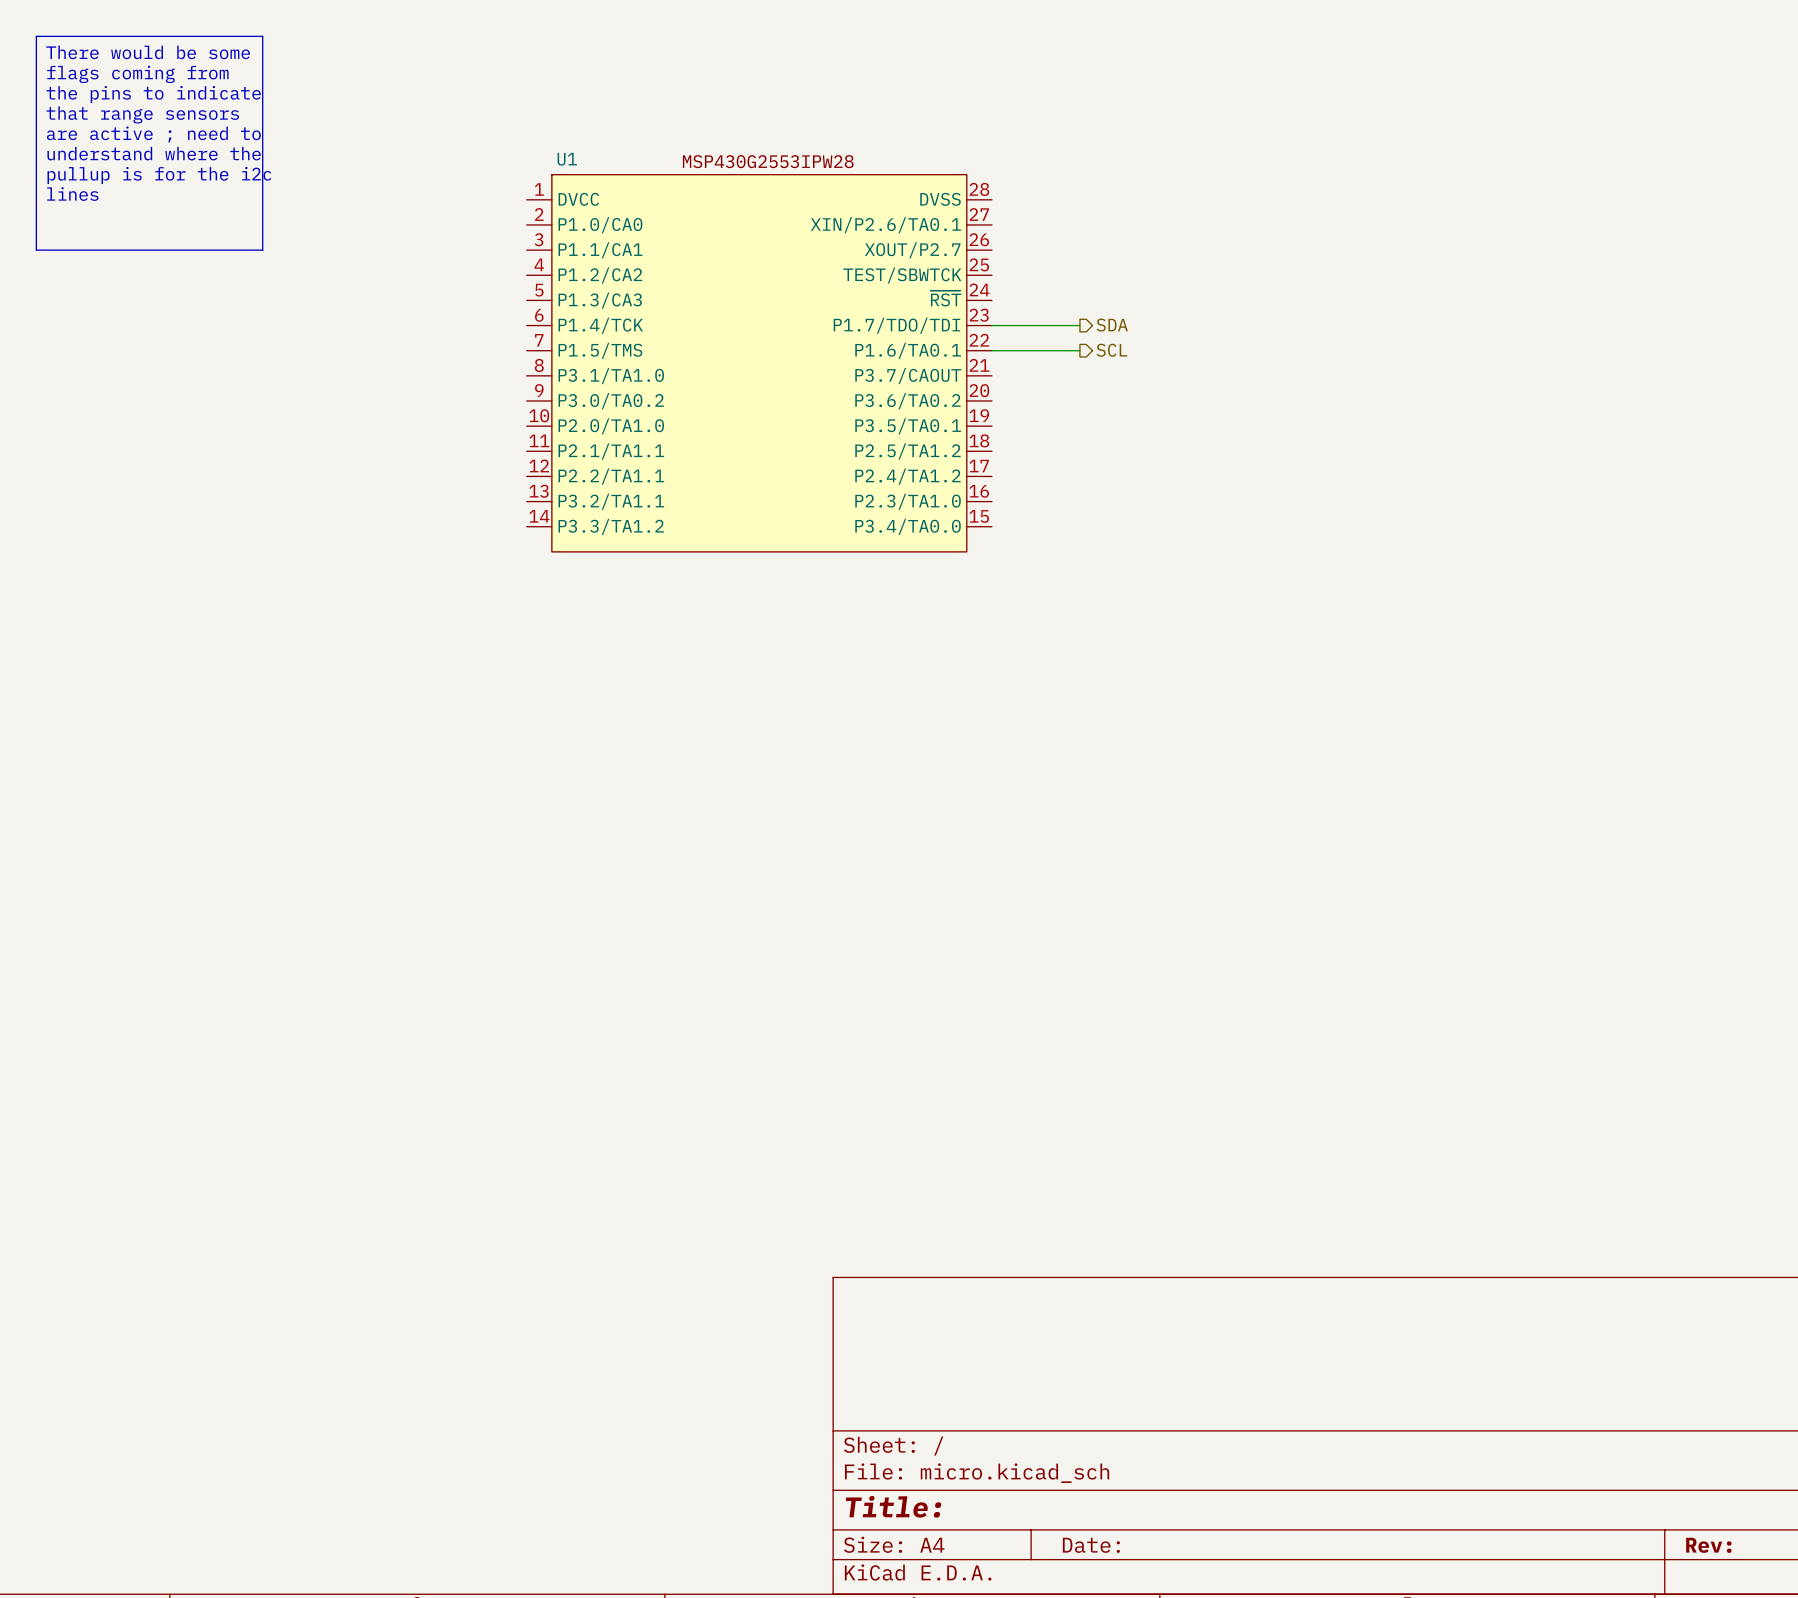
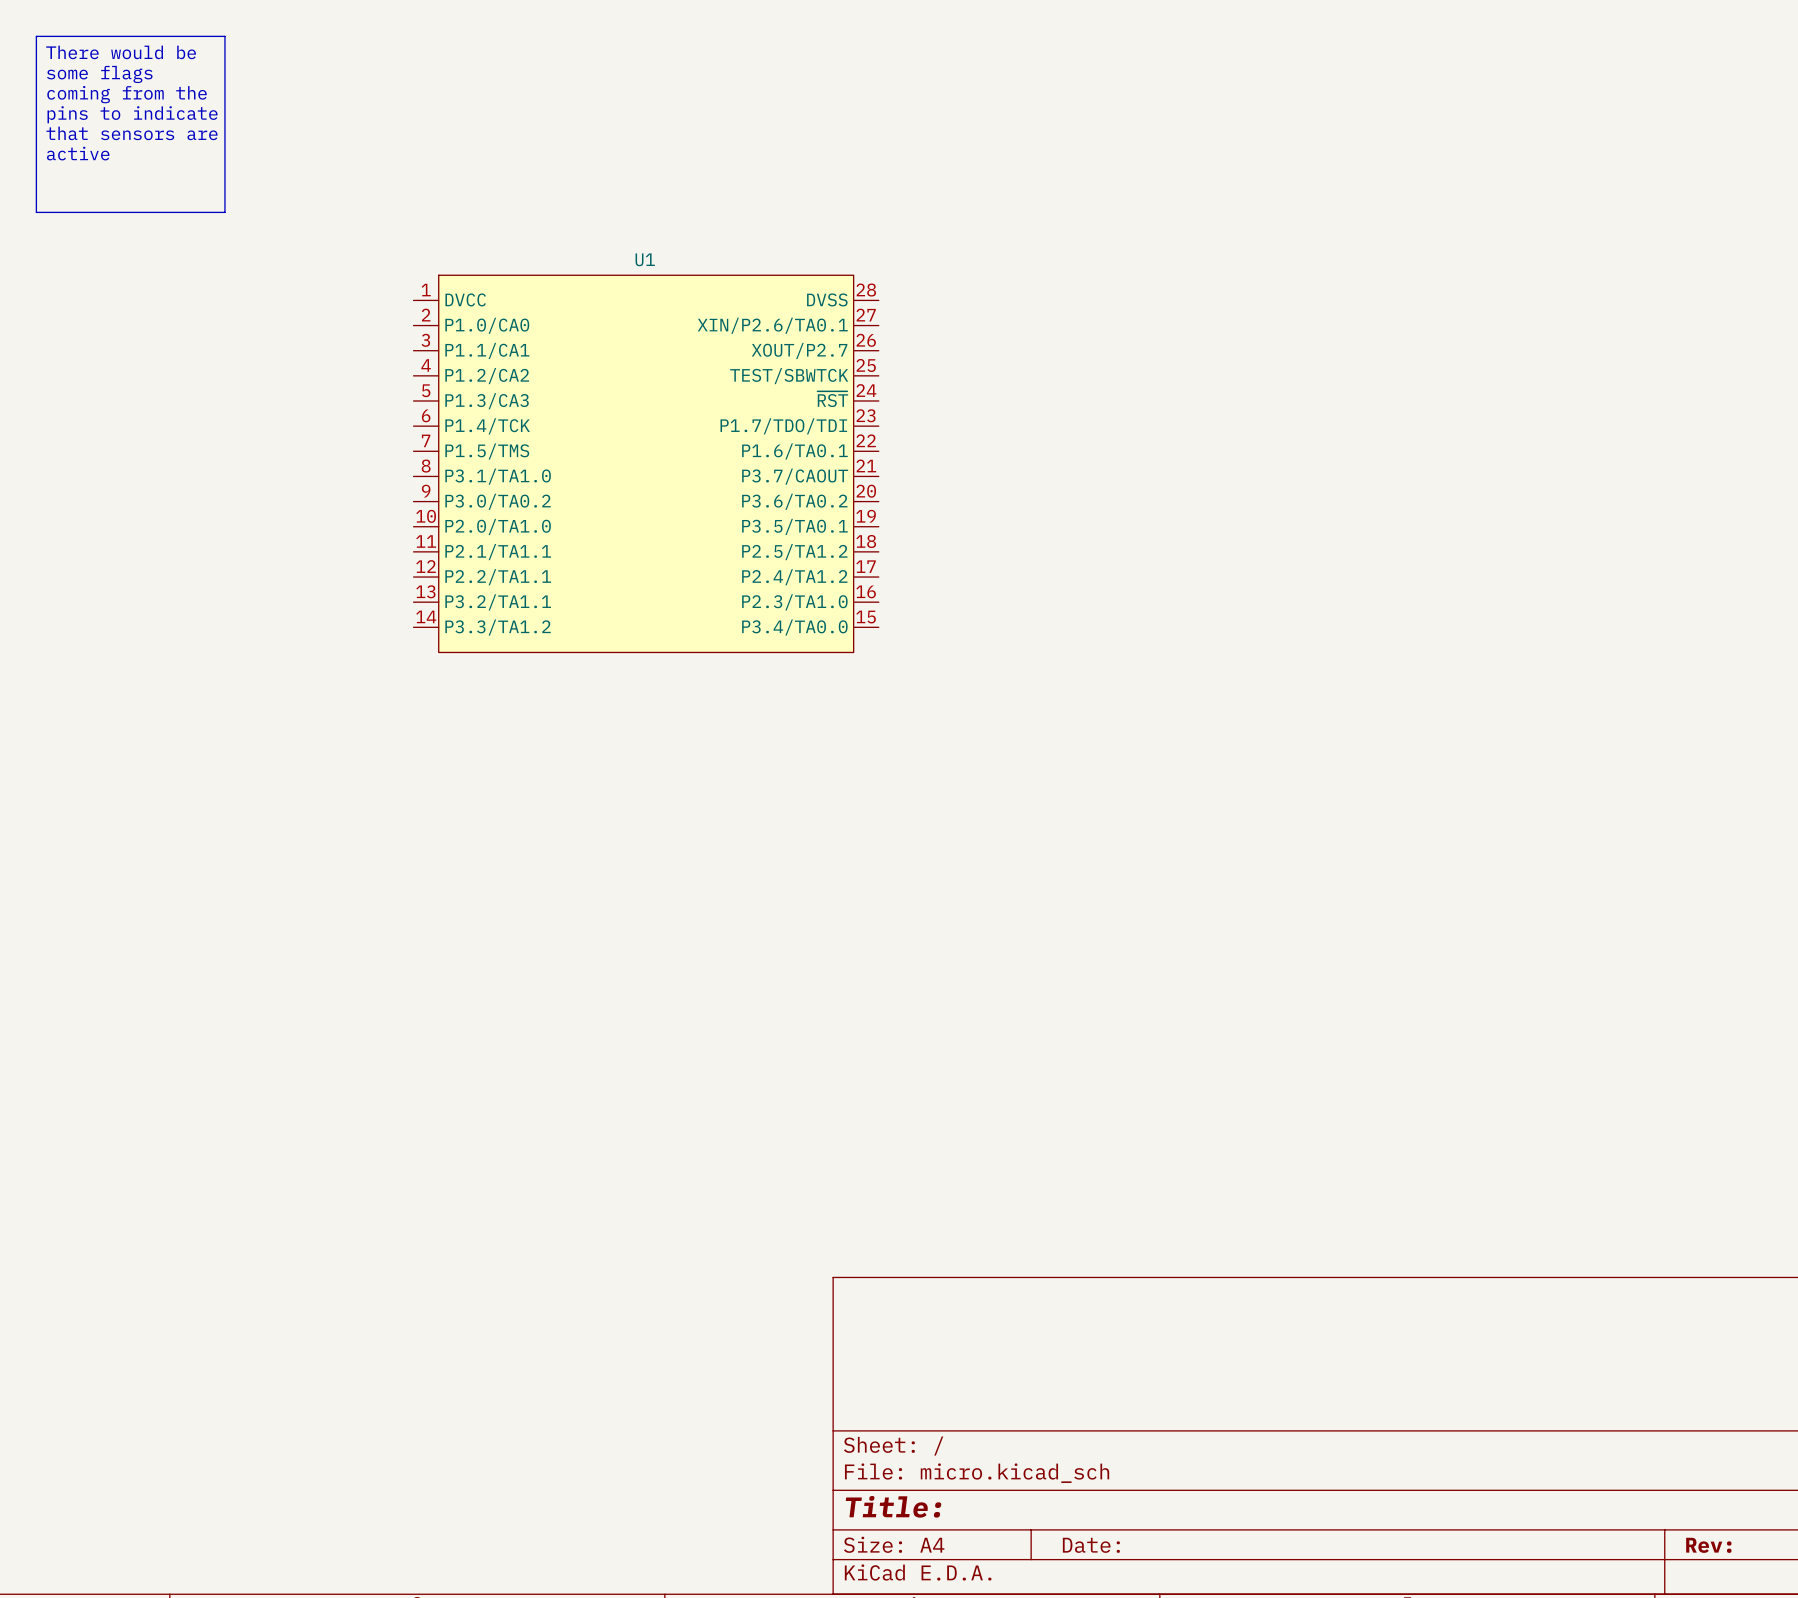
line: (224, 36) (262, 36) (262, 250) (36, 250) (36, 212) -> (224, 36) (224, 212) (36, 212)
text: There would be some (148, 52) -> There would be (121, 52)
text: flags coming from (137, 74) -> some flags (99, 74)
text: the pins to indicate (153, 94) -> coming from the (127, 94)
text: that range sensors (142, 114) -> pins to indicate (132, 114)
text: are active ; need to (153, 134) -> that sensors are (132, 133)
text: understand where the (154, 153) -> active (78, 153)
U1 name position: U1 (567, 159) -> U1 (645, 259)
U1 text: MSP430G2553IPW28 (768, 161) -> none
text: pullup is for the i2c (159, 175) -> none
text: lines (72, 194) -> none
wire: (991, 325) (1079, 325) -> none
hierarchical label: SDA (1112, 325) -> none
wire: (991, 350) (1079, 350) -> none
hierarchical label: SCL (1111, 350) -> none
U1 position: (759, 363) -> (646, 463)

